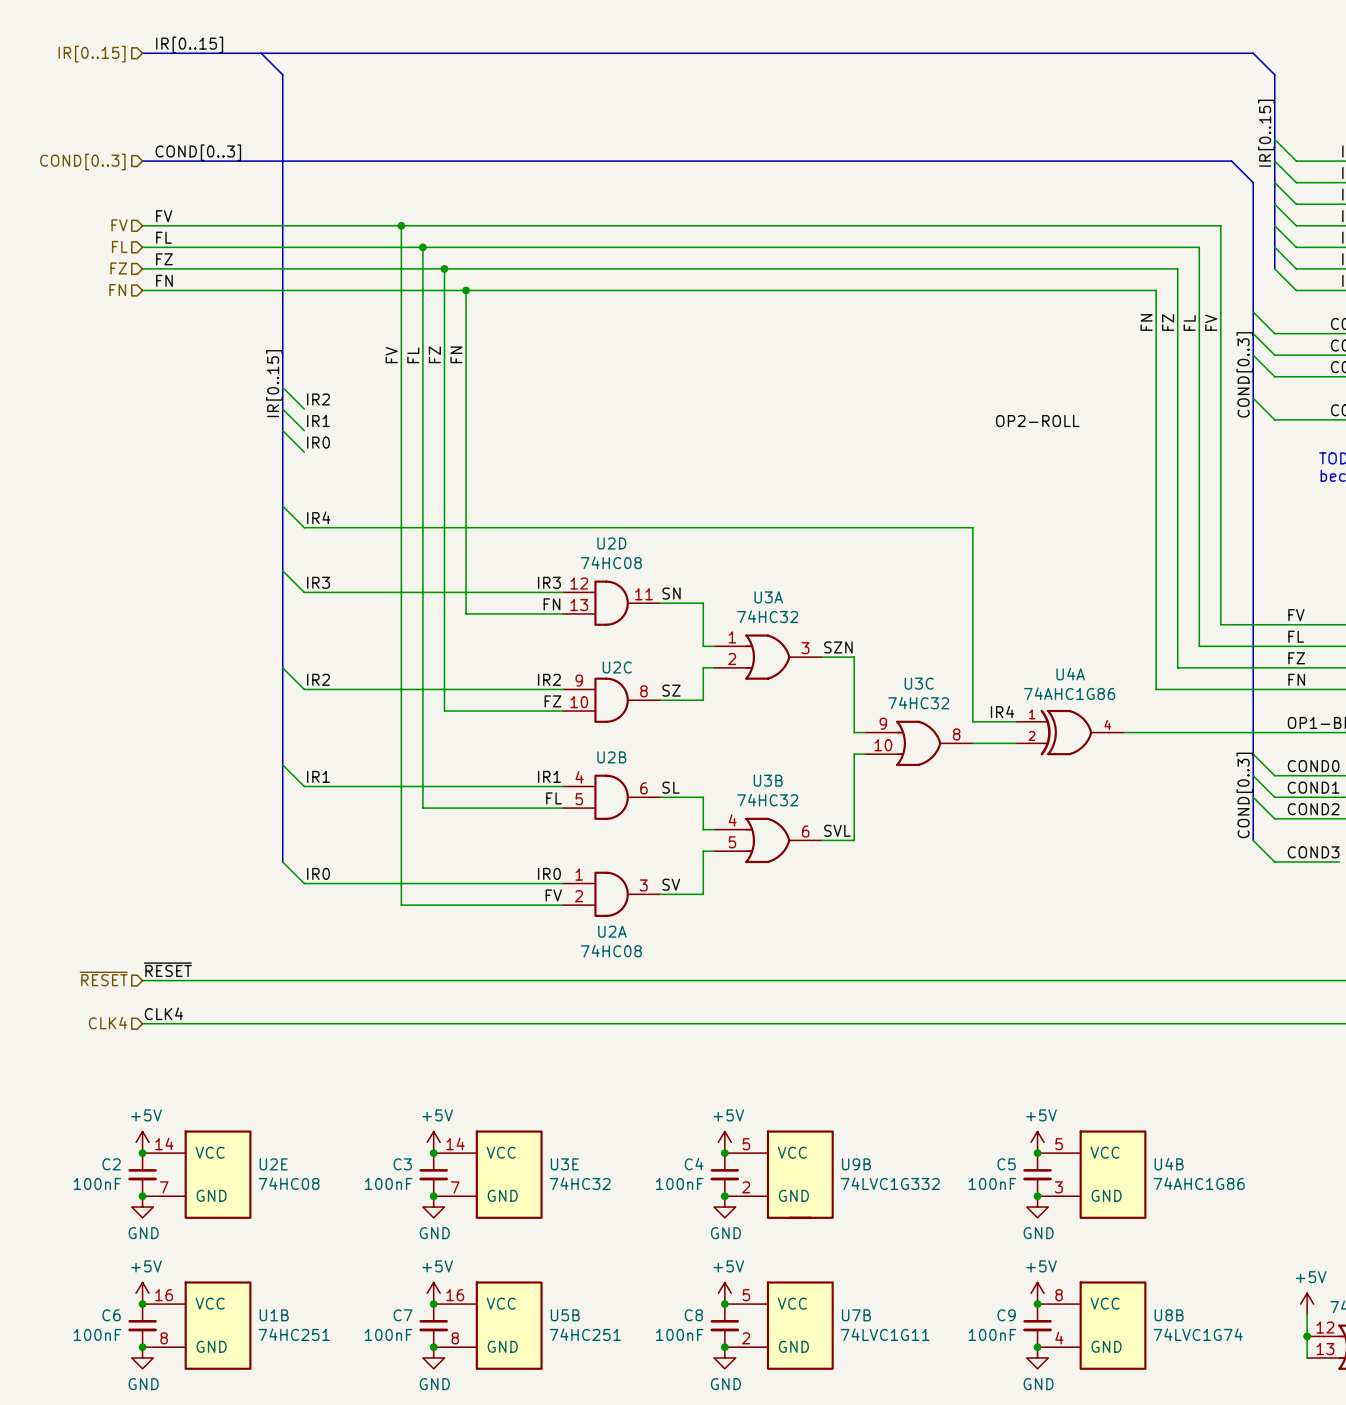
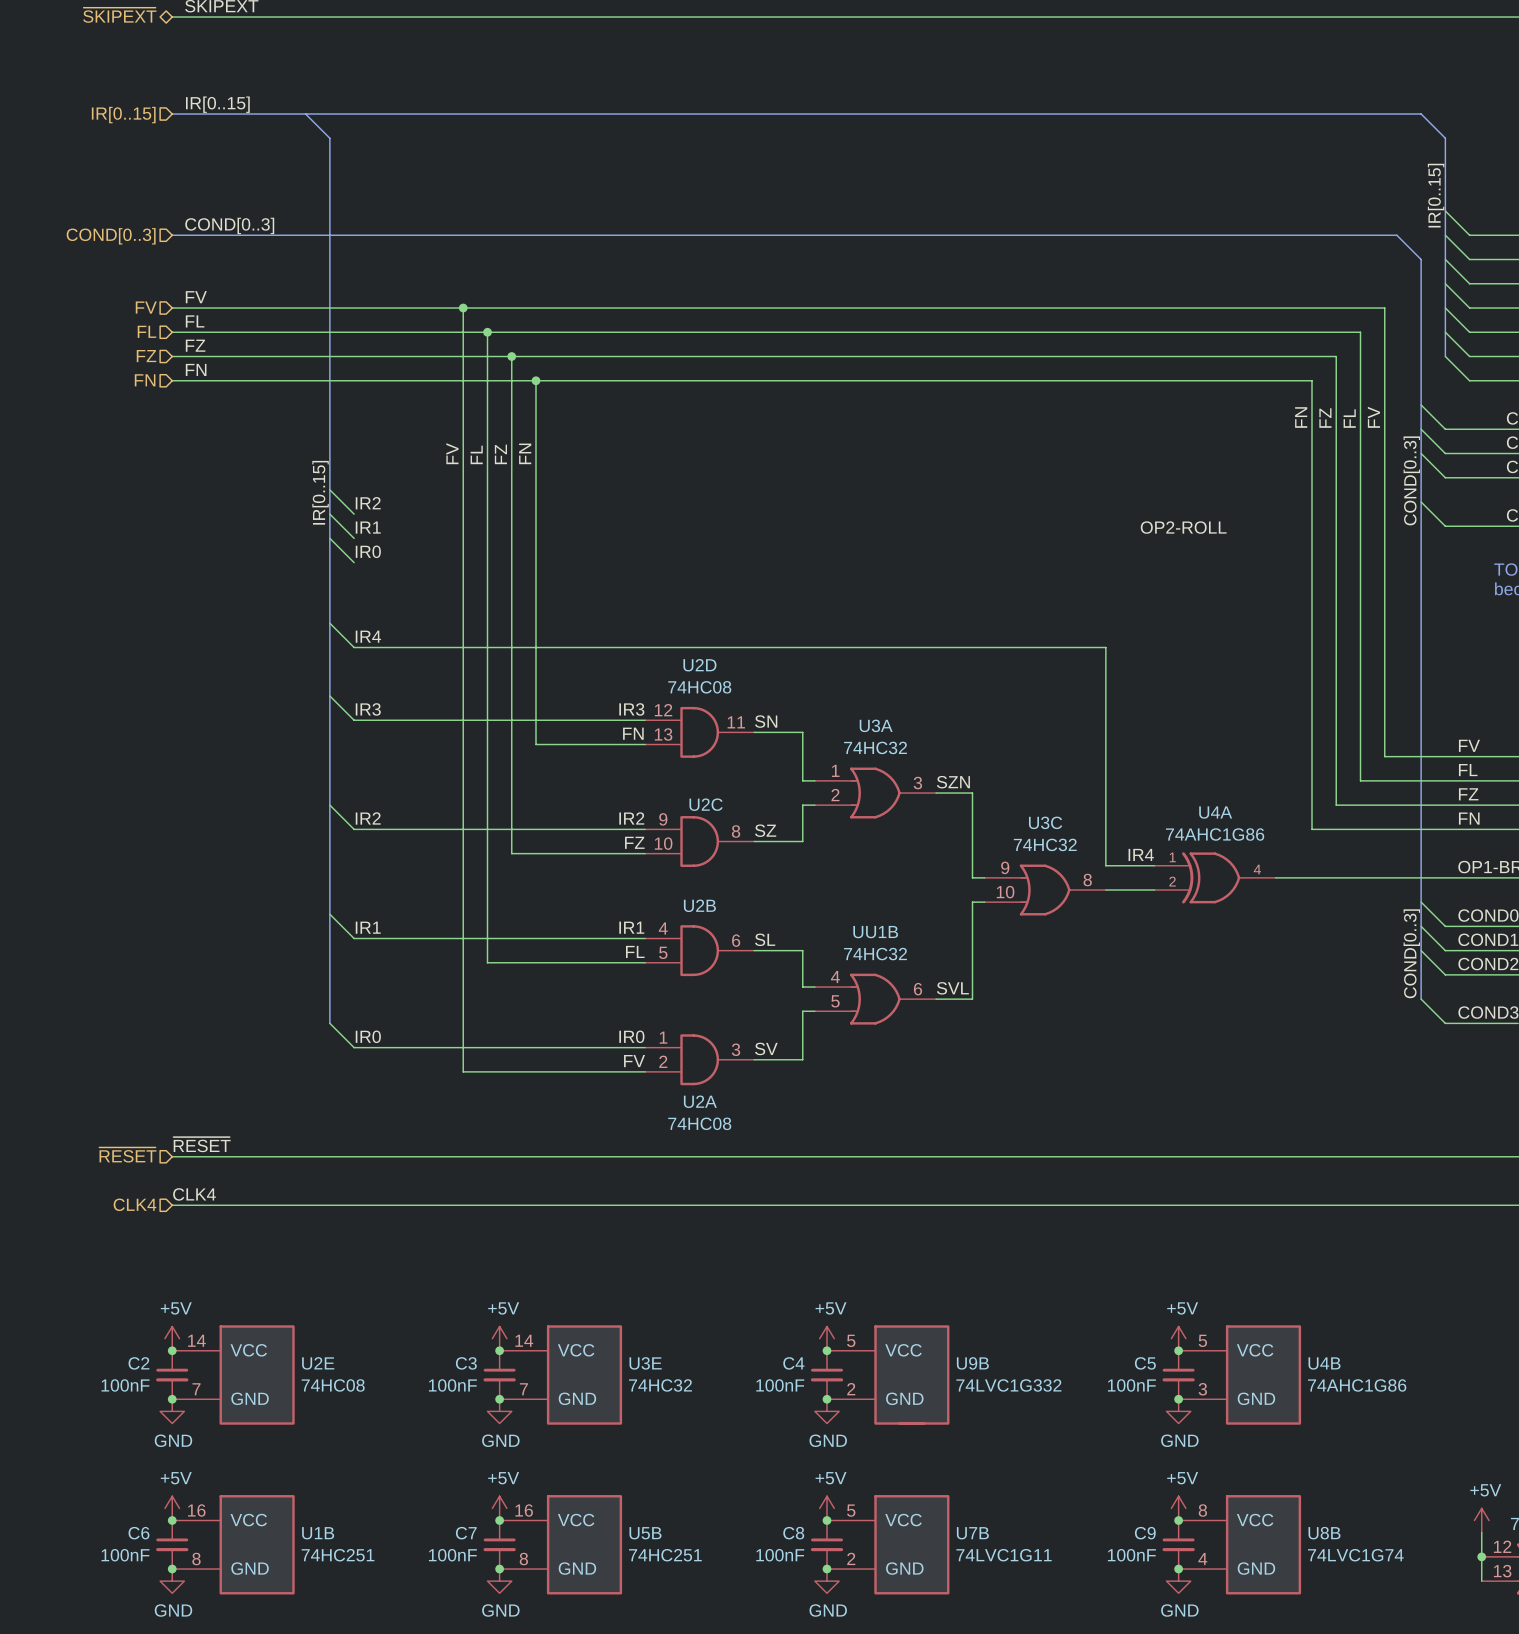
U3B name: U3B (768, 780) -> UU1B (875, 932)

